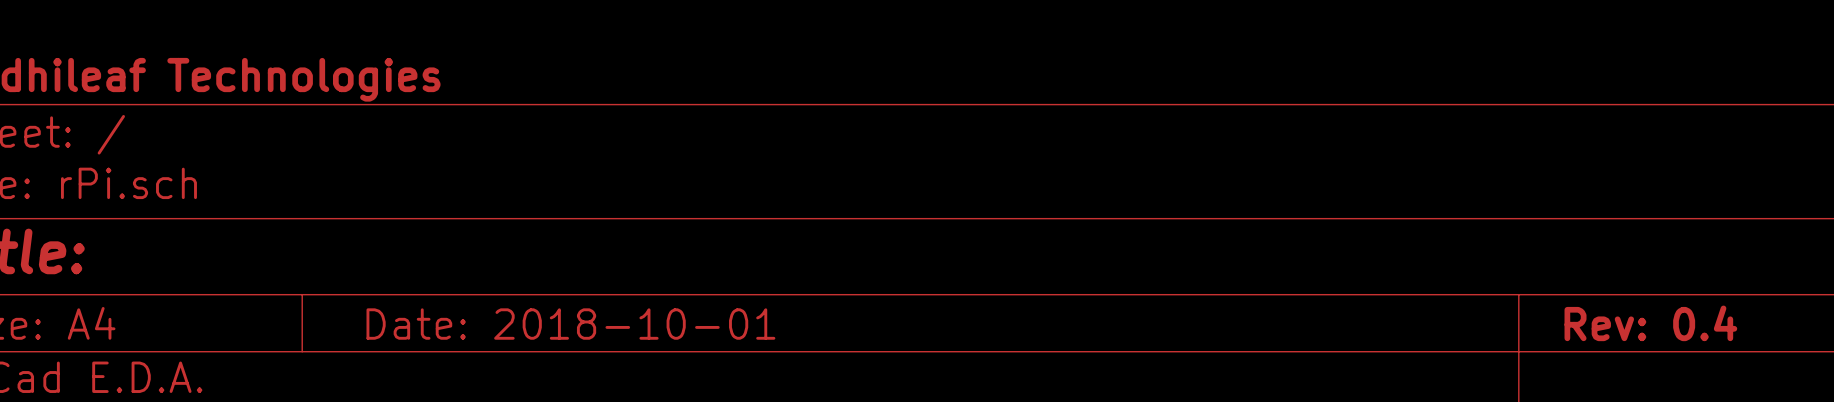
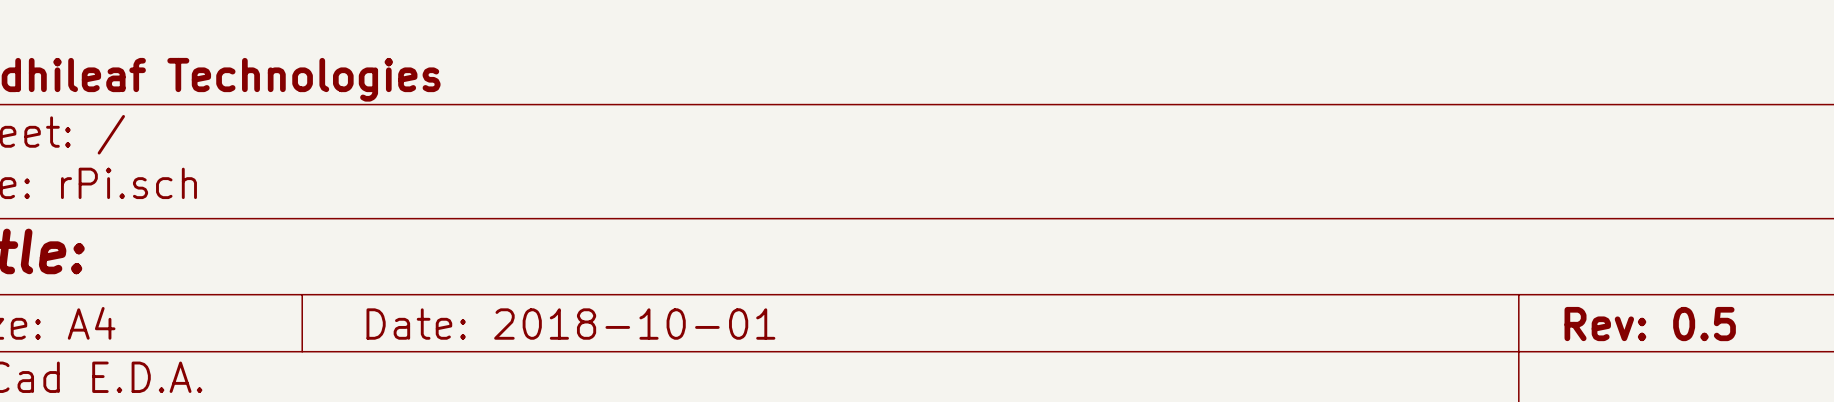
title block: Rev: 0.4 (1650, 323) -> Rev: 0.5 (1650, 324)

